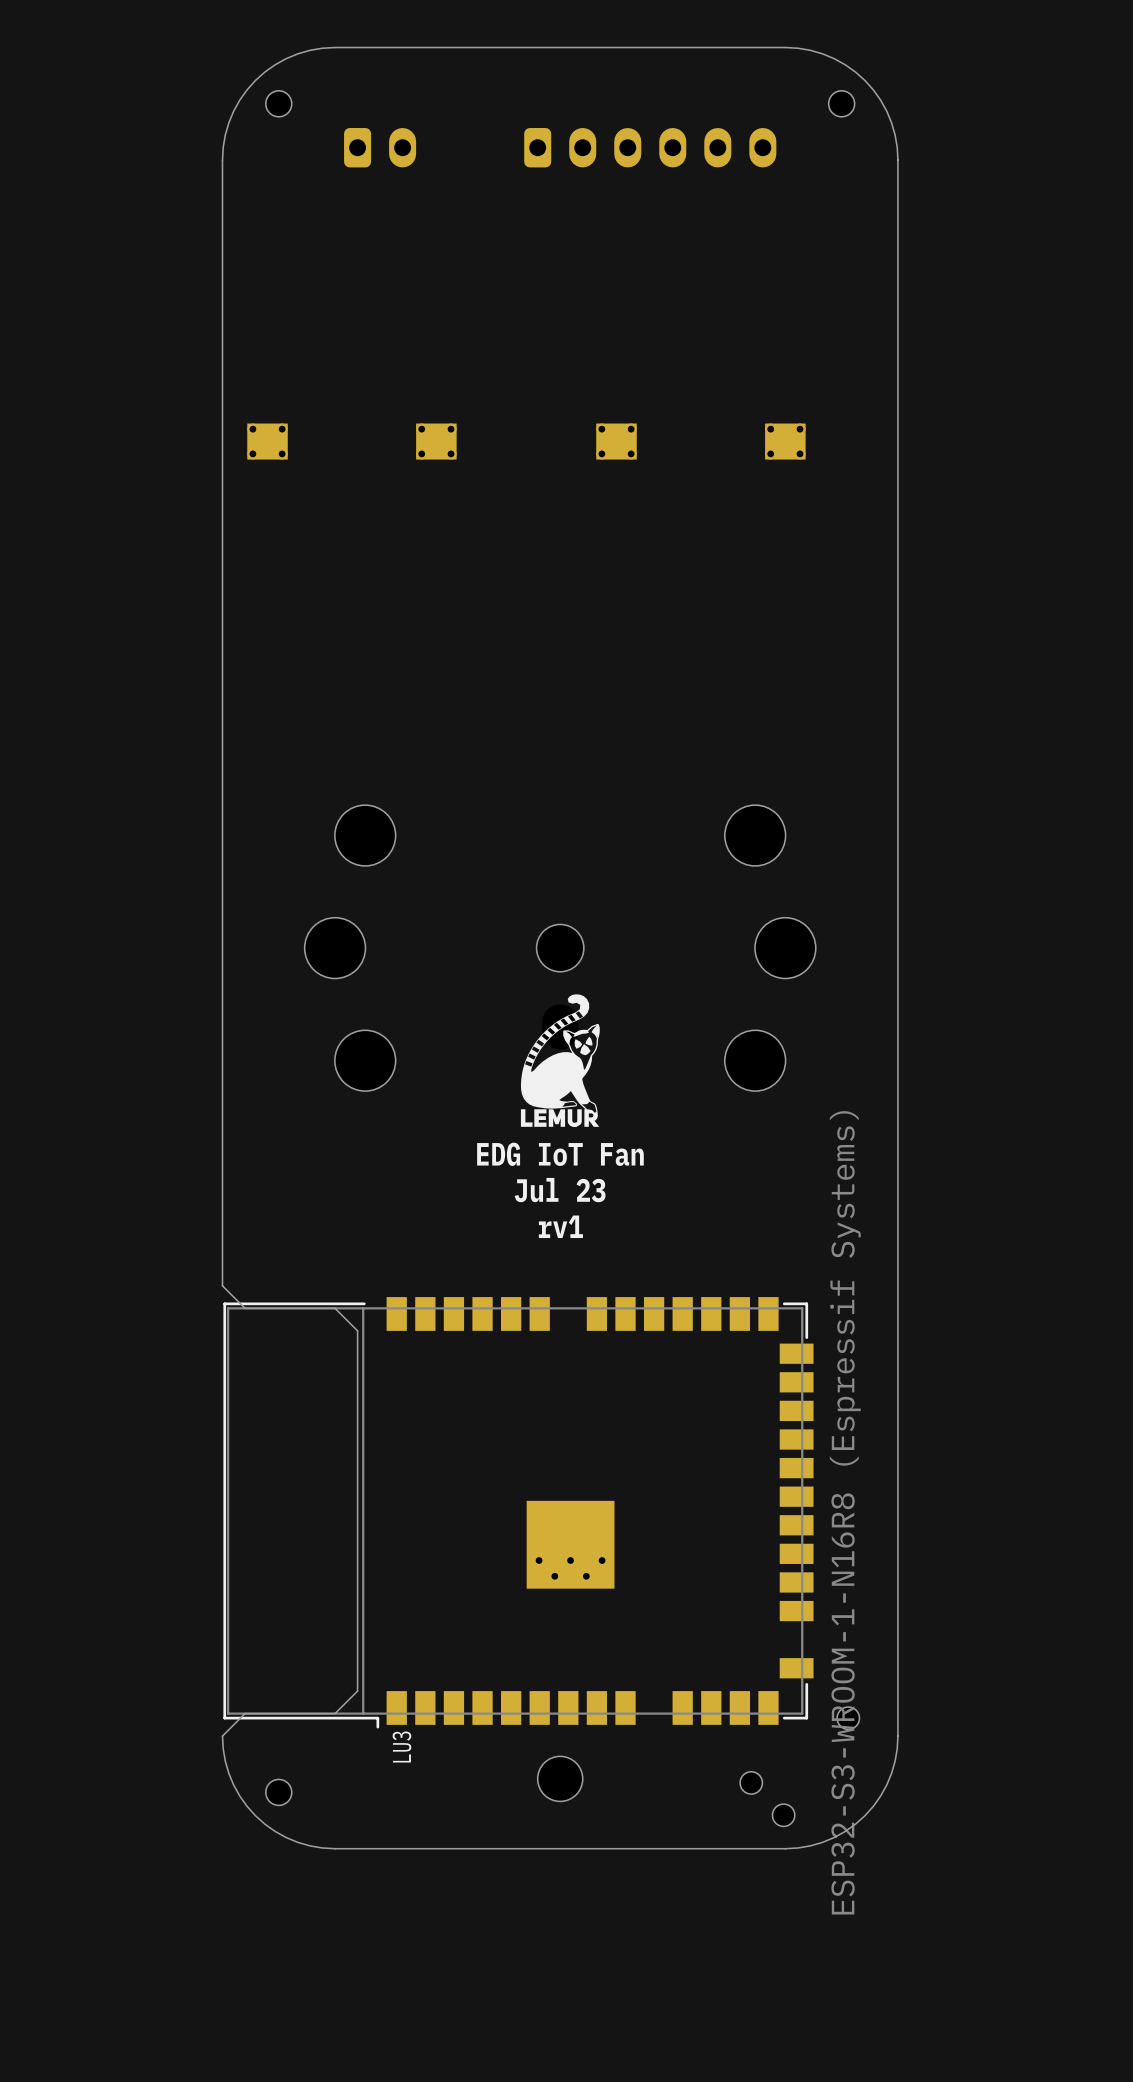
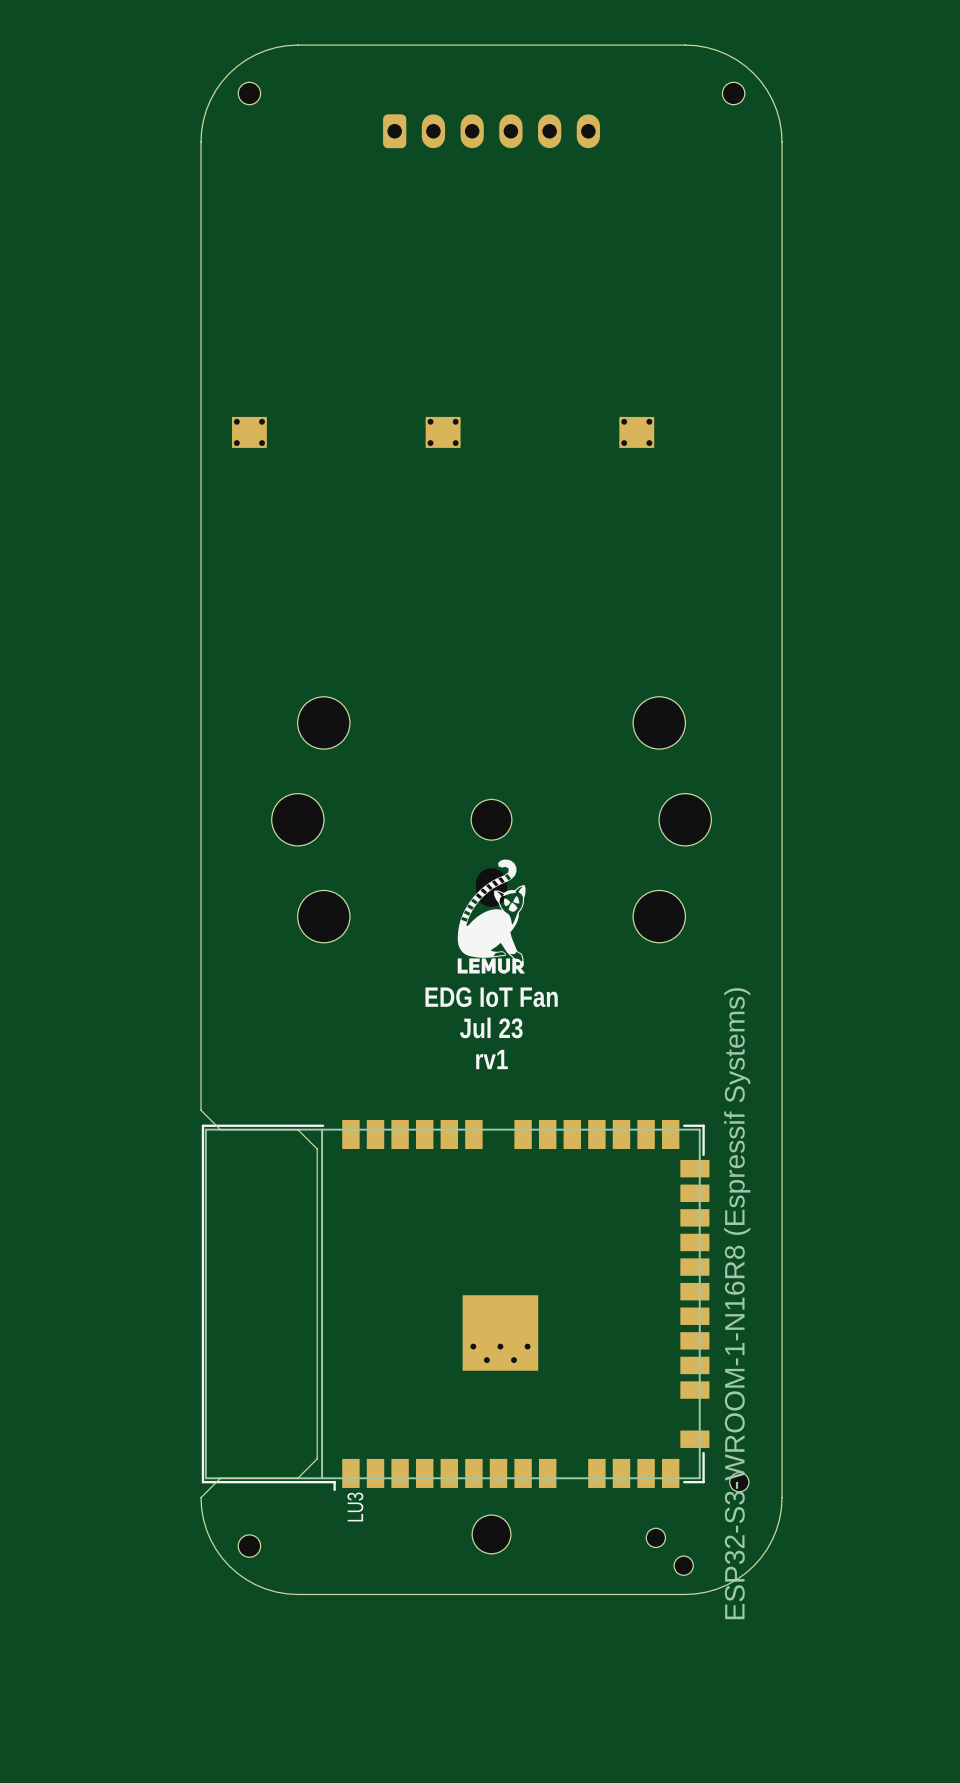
part: (380, 147) -> none
part position: (650, 147) -> (491, 131)
part position: (267, 441) -> (249, 432)
part: (436, 441) -> none
part: (616, 441) -> none
part: (785, 441) -> none
part: none -> (443, 432)
part: none -> (636, 432)

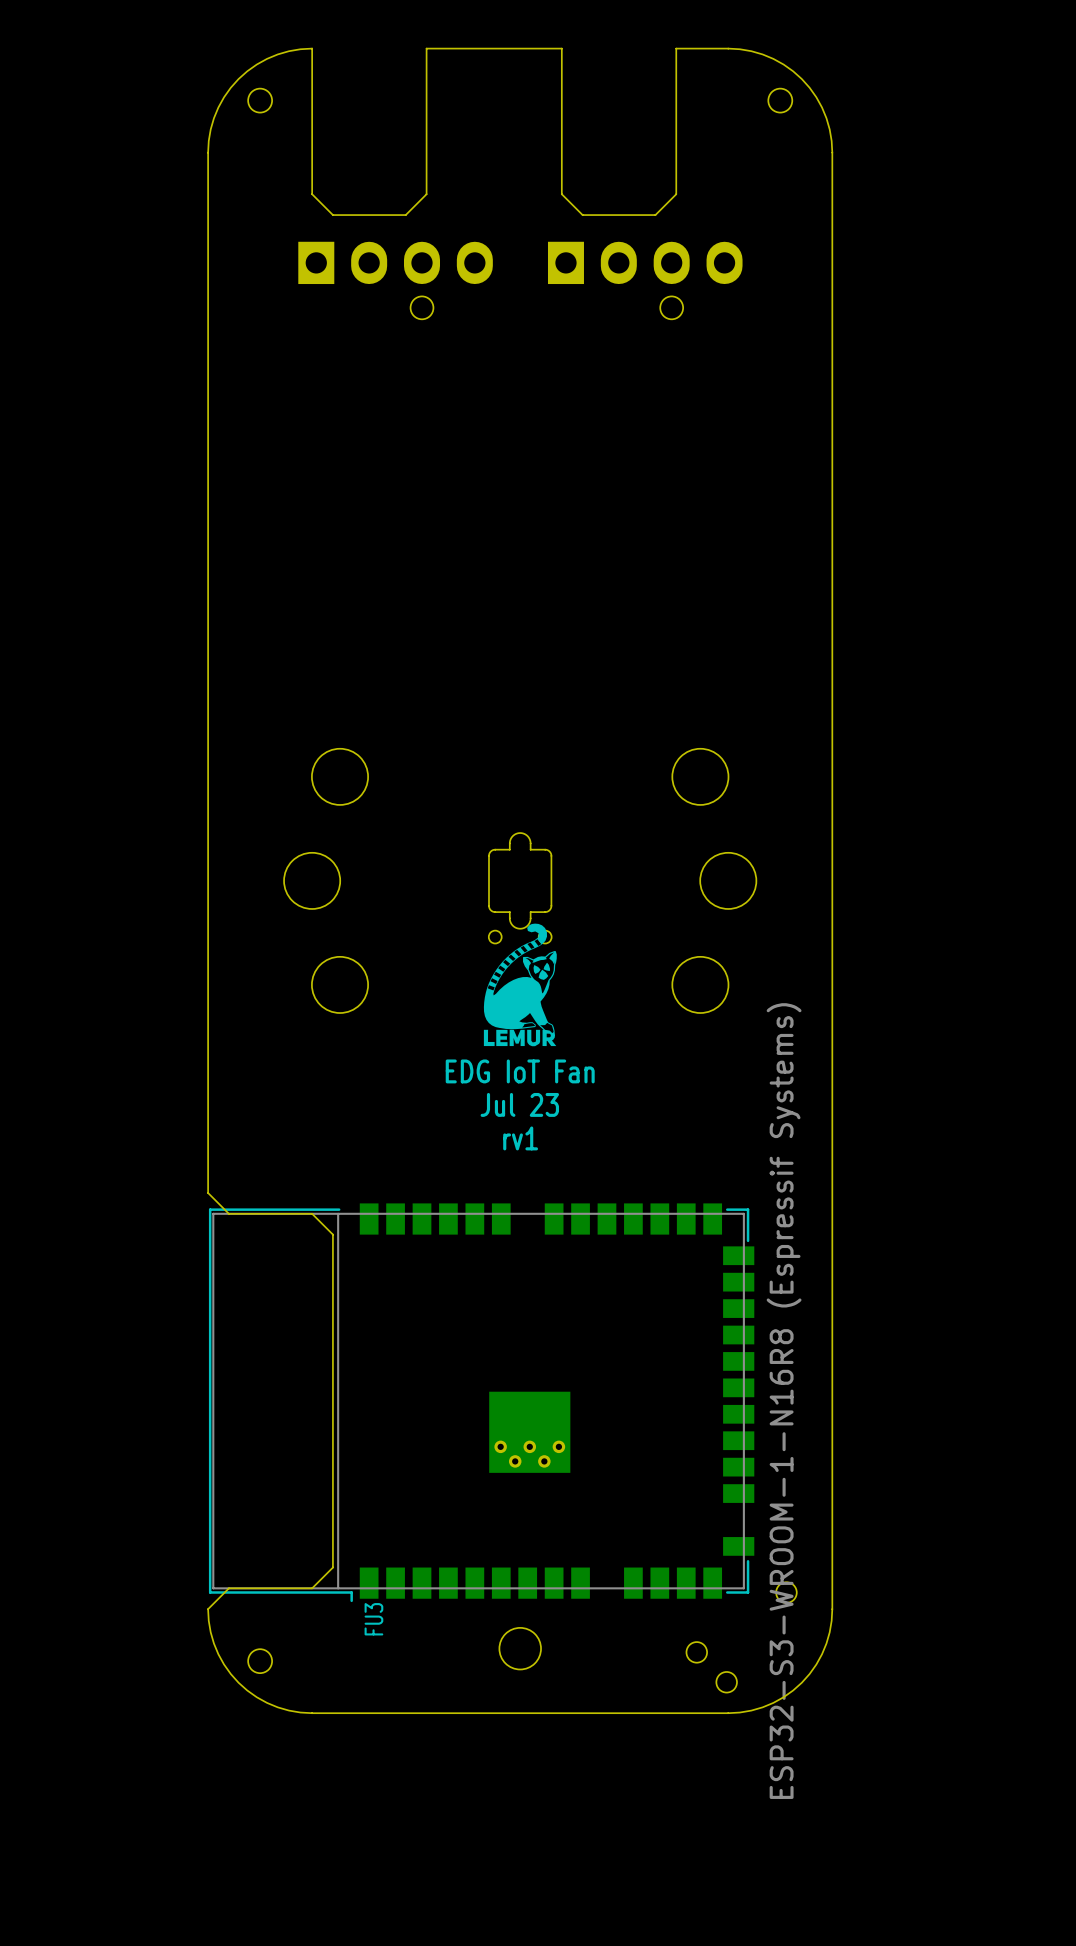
board edge: (404, 45) (297, 45) -> (426, 48) (426, 194) (405, 215) (332, 215) (312, 194) (312, 48)
board edge: (636, 45) (530, 45) -> (676, 48) (676, 194) (655, 215) (582, 215) (561, 194) (561, 48)
part: (491, 131) -> none
part: none -> (395, 280)
part: none -> (645, 280)
part: (249, 432) -> none
part: (443, 432) -> none
part: (636, 432) -> none
part: none -> (520, 888)
part: (491, 853) -> none
LU3 name: LU3 (355, 1507) -> FU3 (373, 1619)

